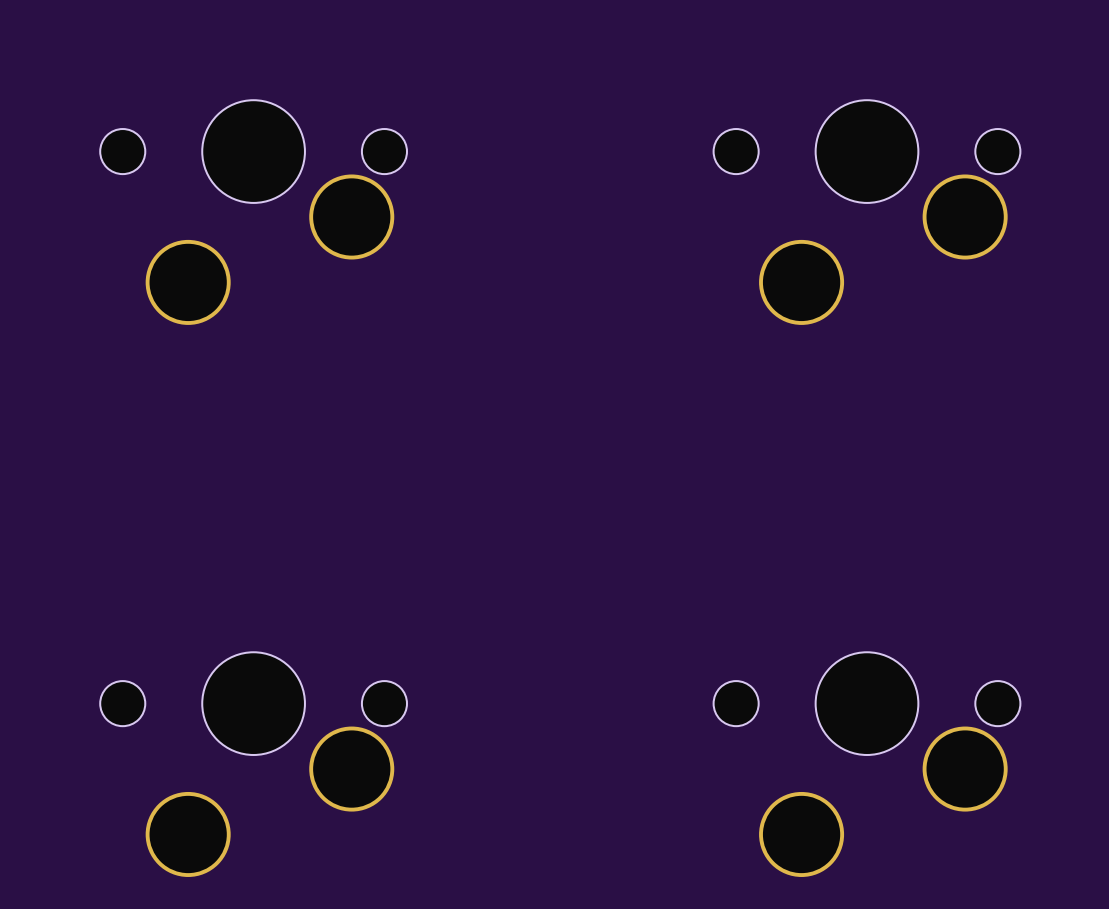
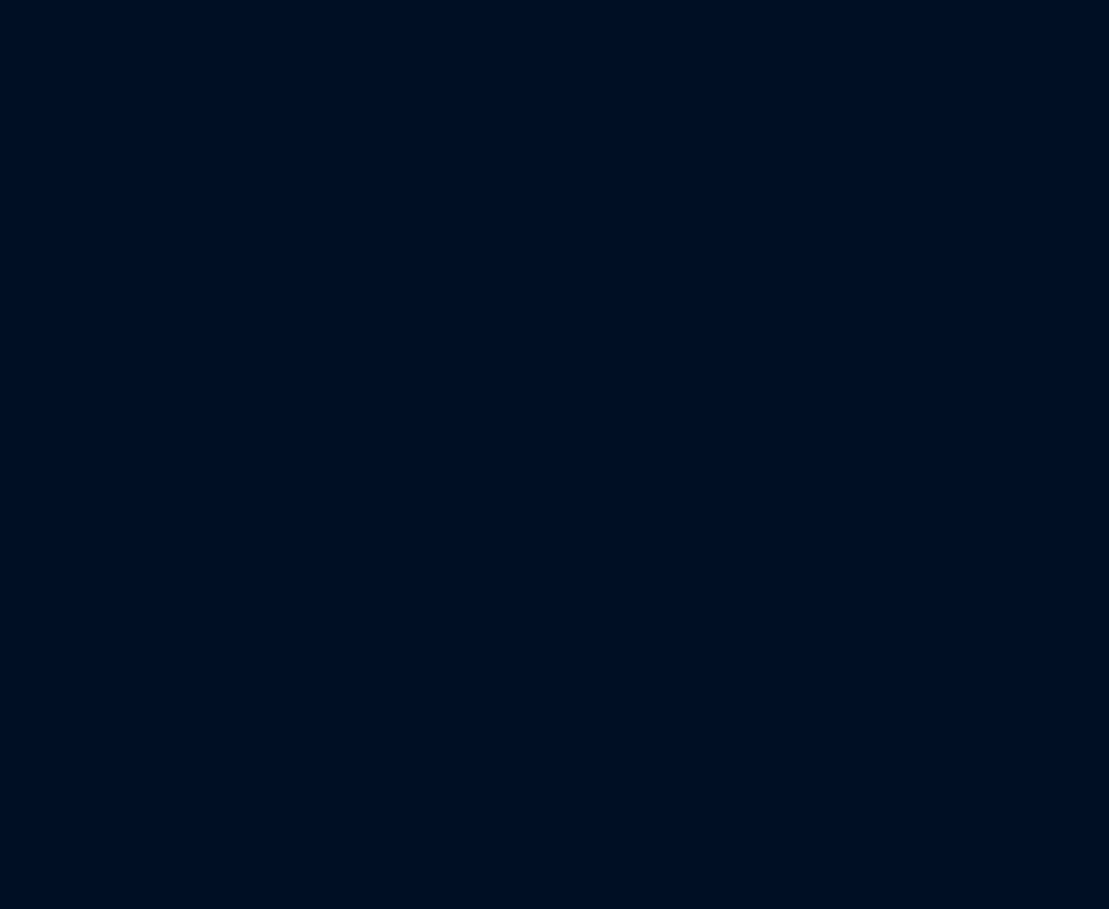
part: (253, 212) -> none
part: (867, 212) -> none
part: (253, 764) -> none
part: (867, 764) -> none

